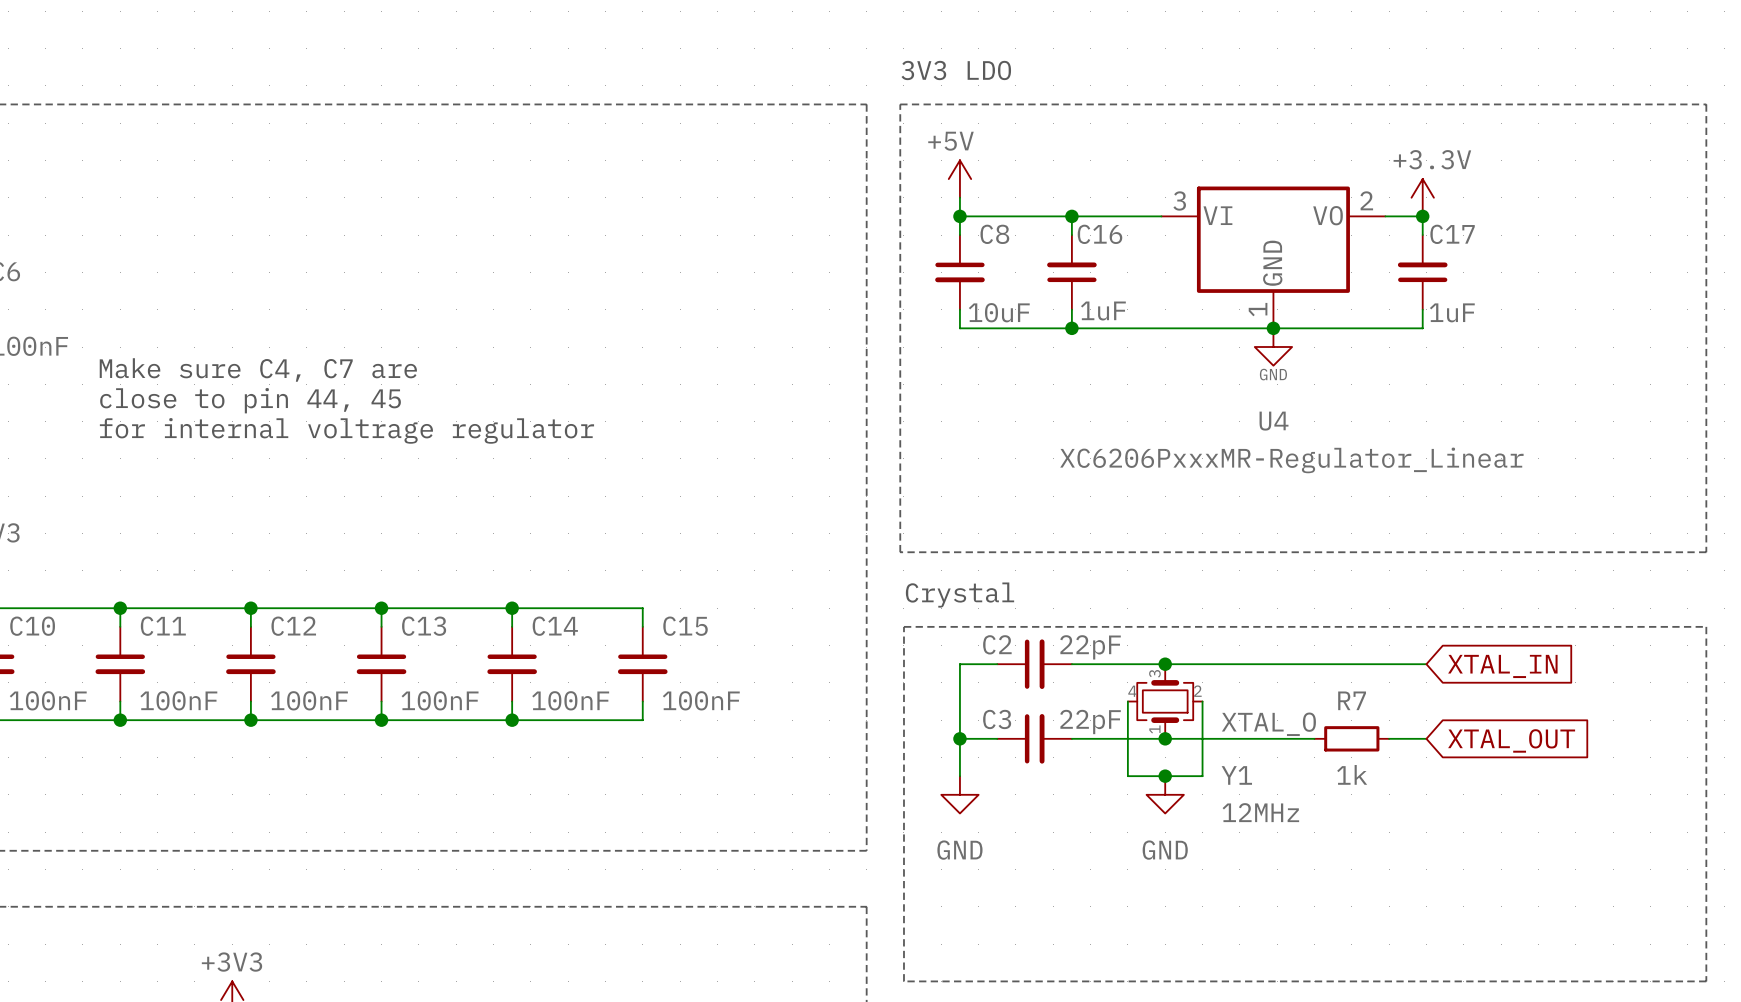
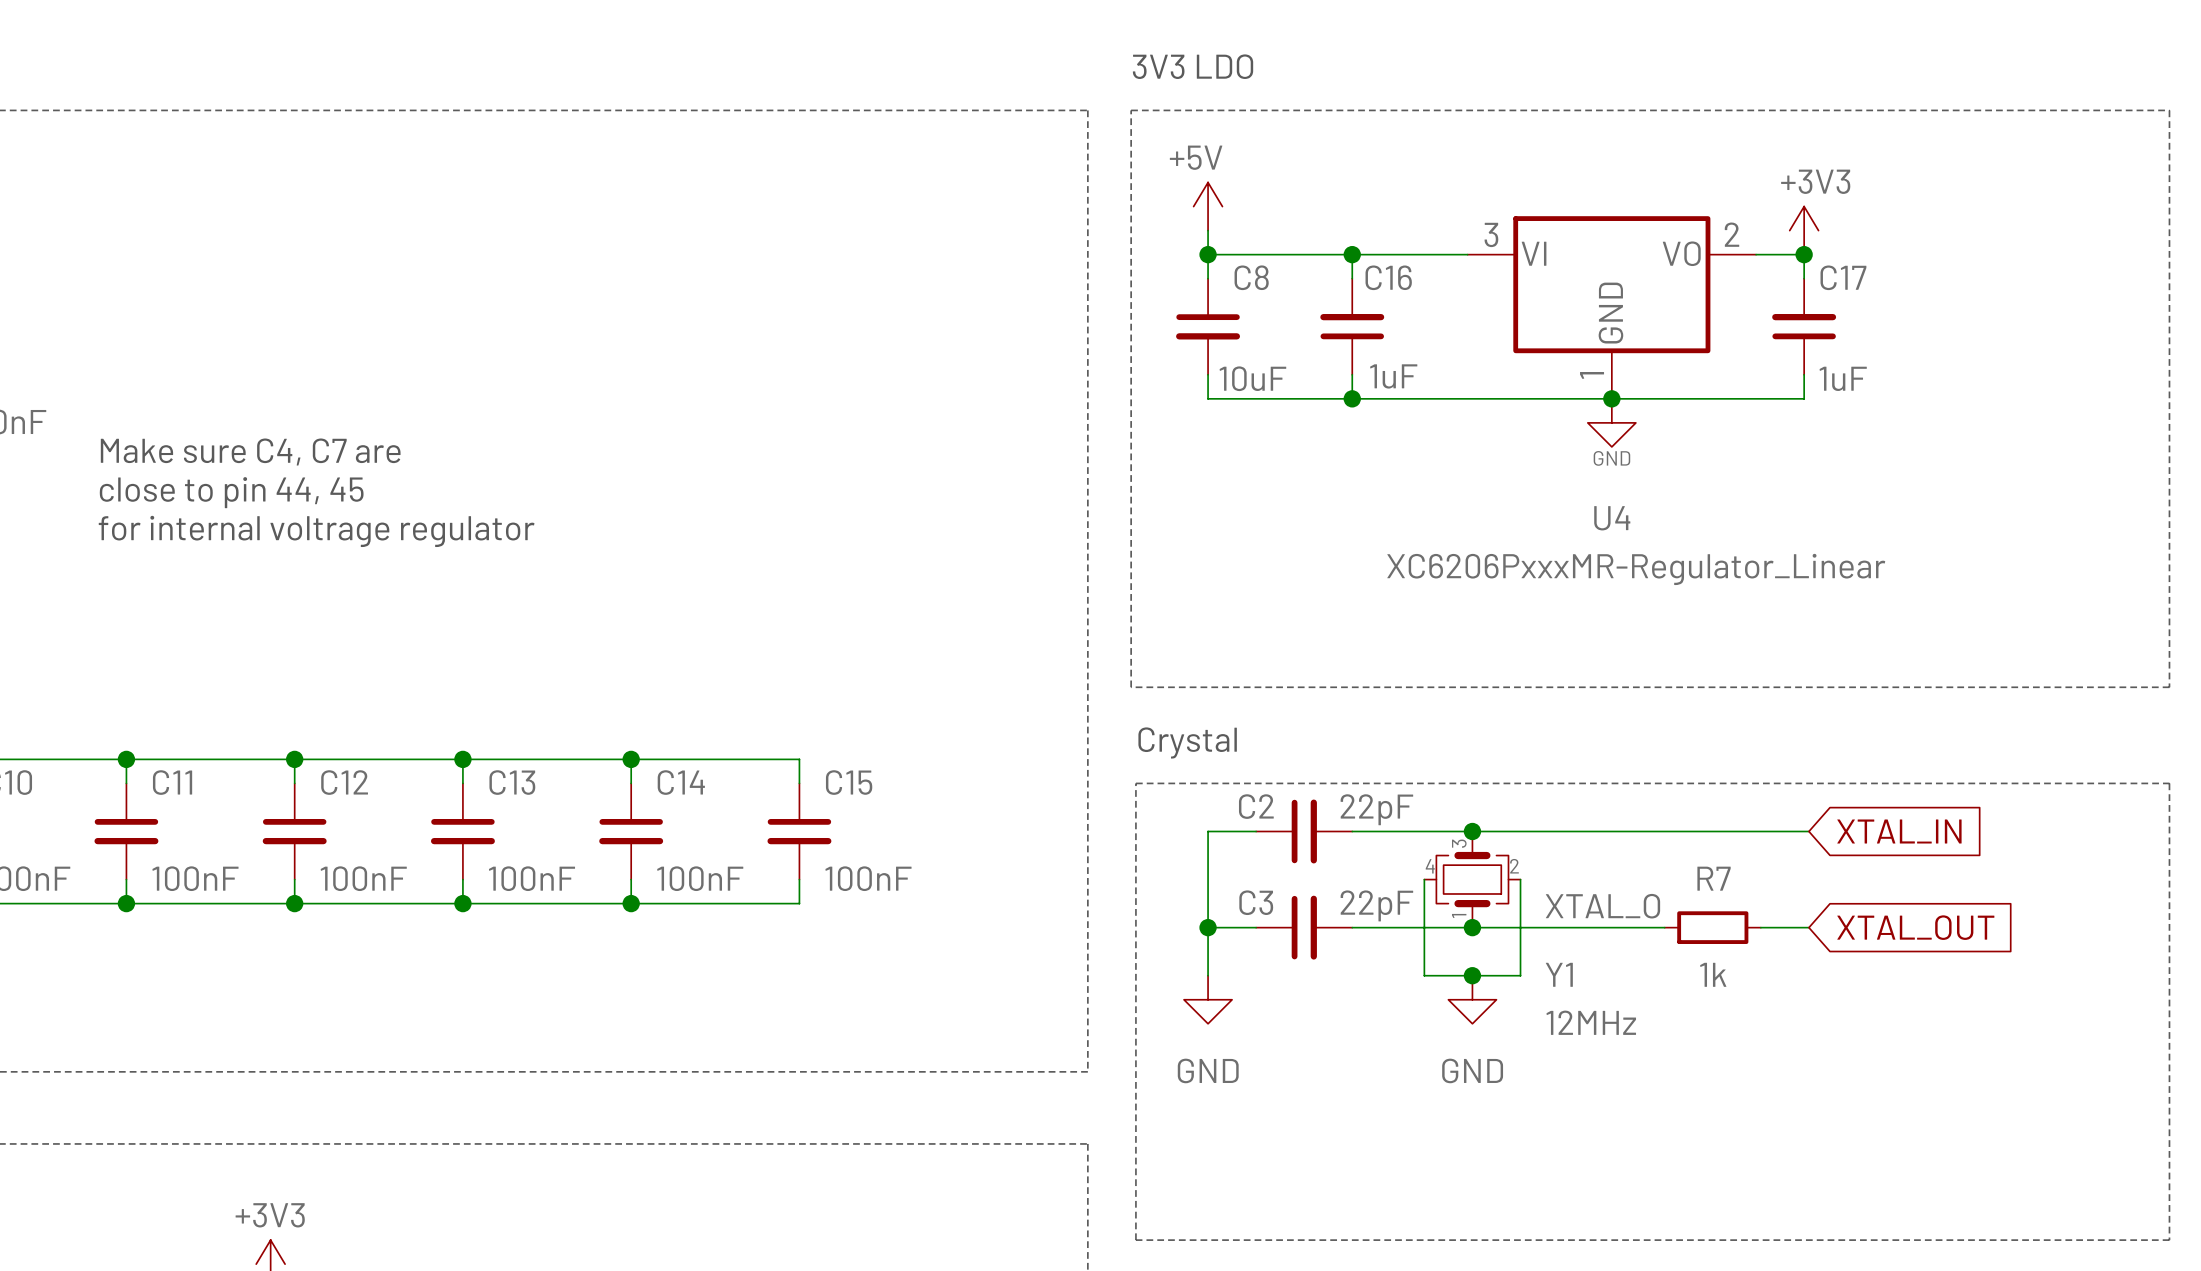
power symbol: +3.3V (1422, 197) -> +3V3 (1804, 230)

